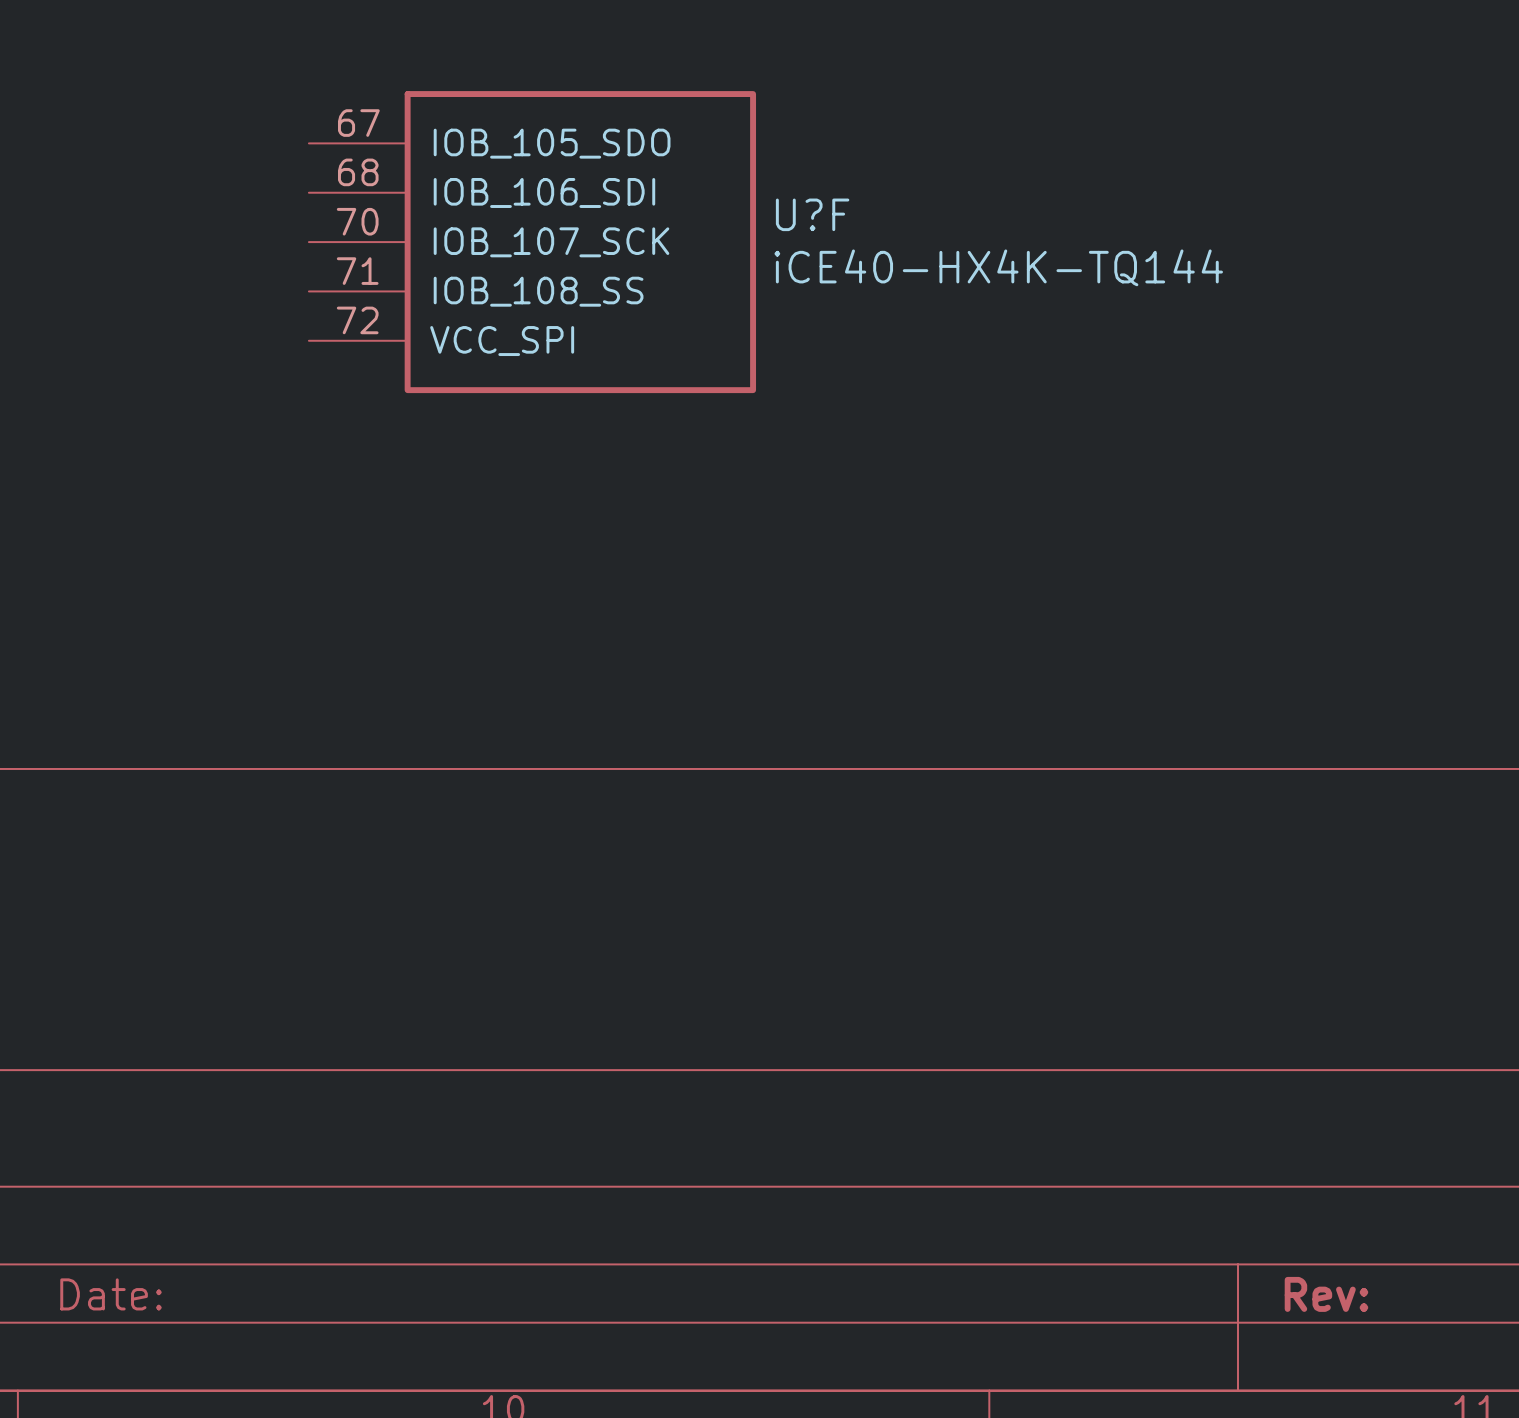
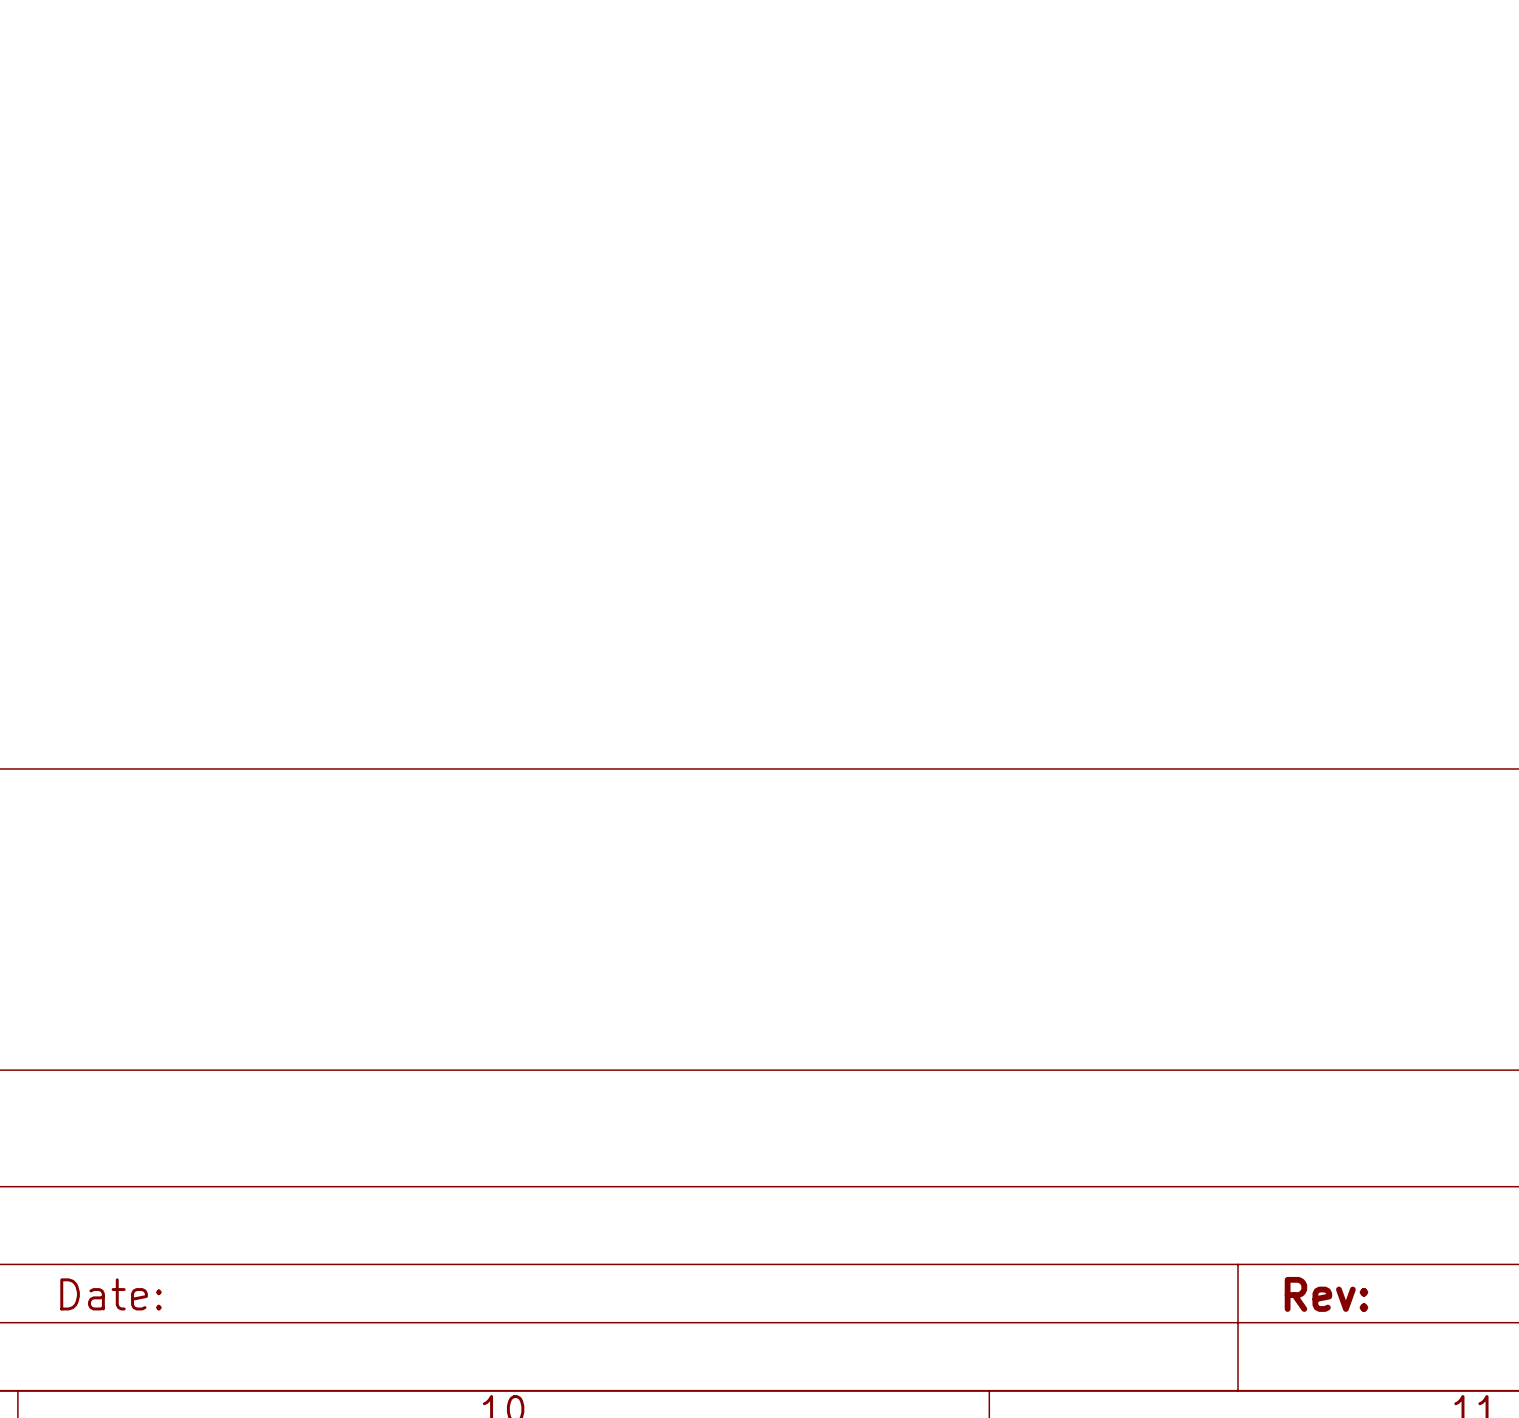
U?F: iCE40-HX4K-TQ144 (532, 242) -> none

